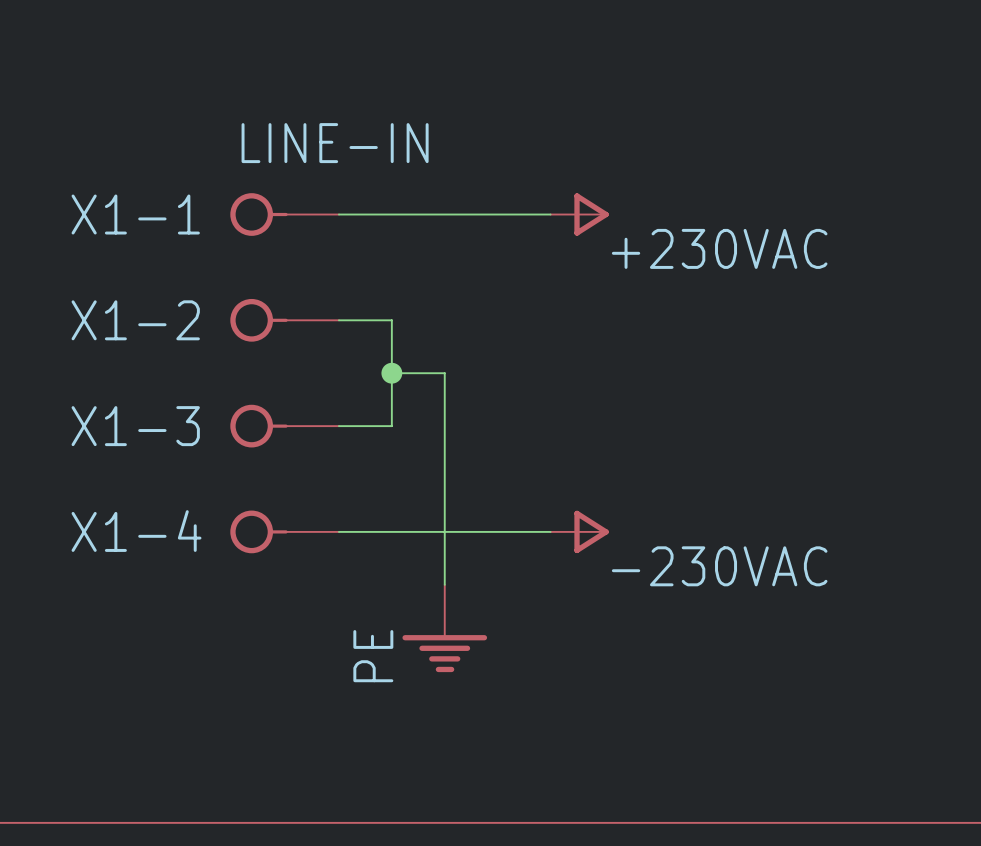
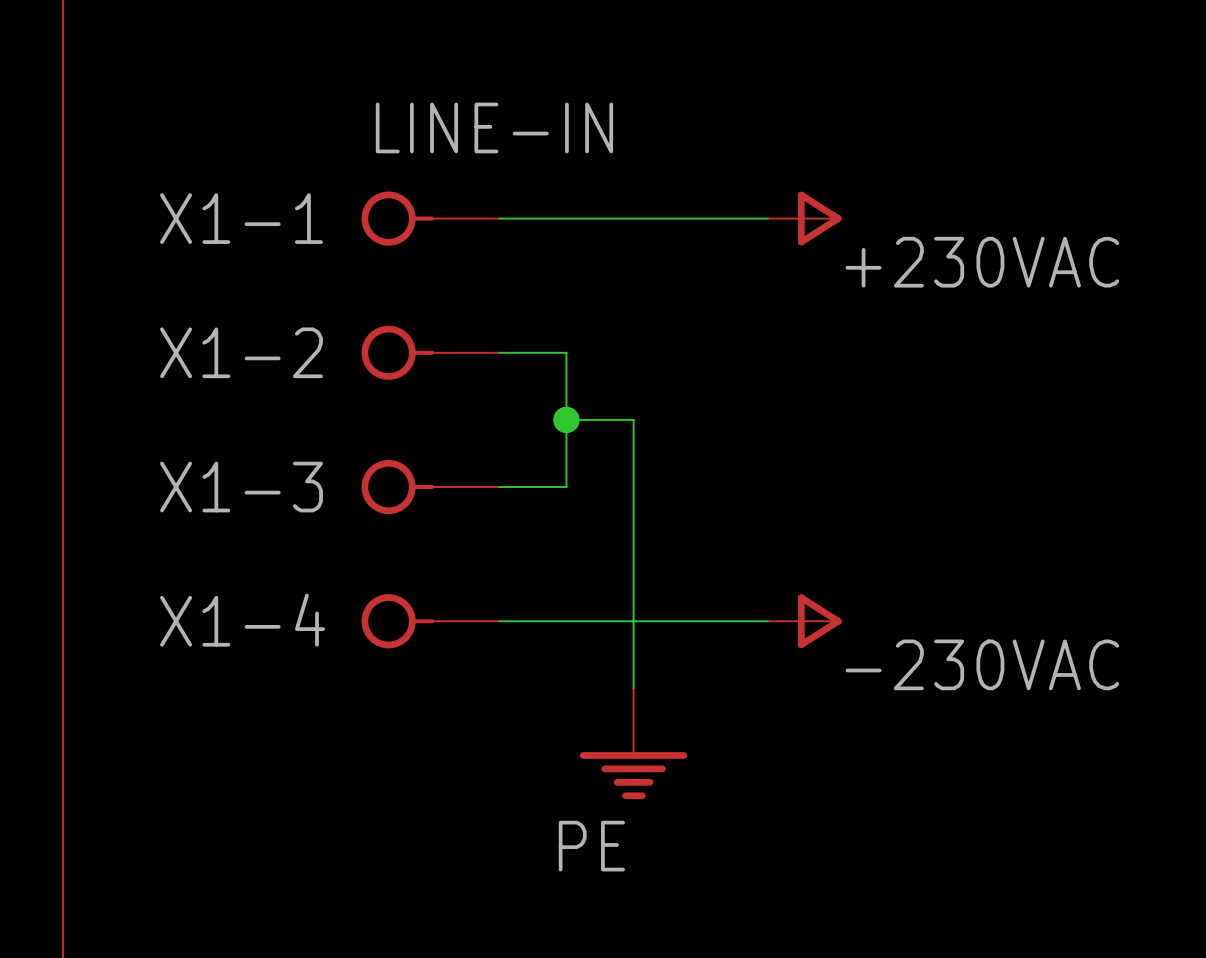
power symbol text rotation: 0° (373, 656) -> 90° clockwise (591, 846)

